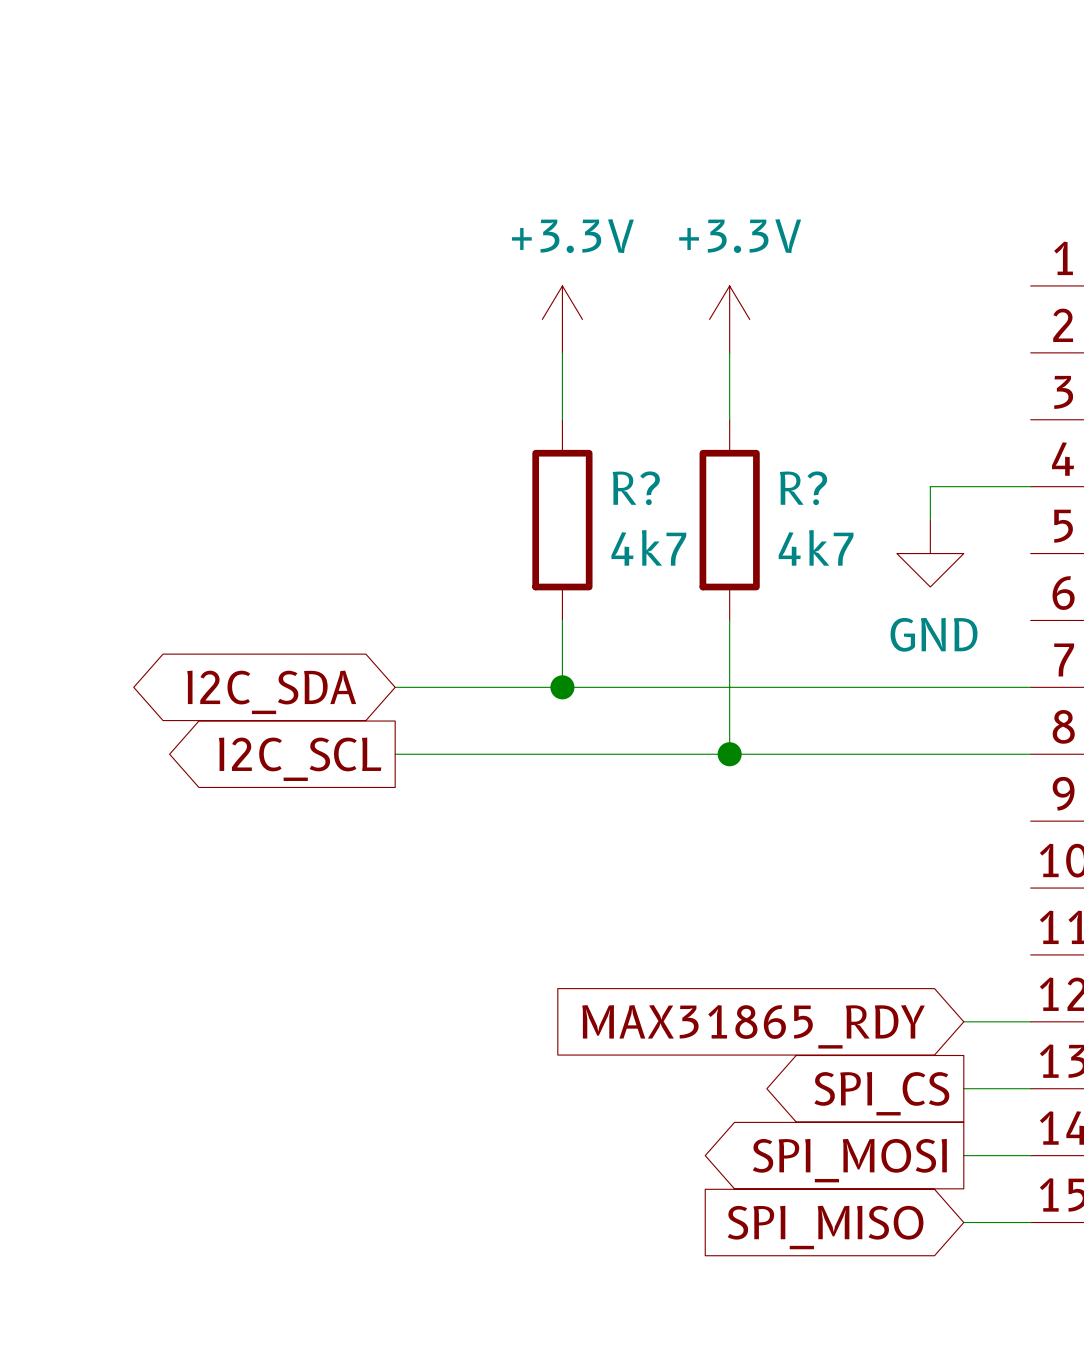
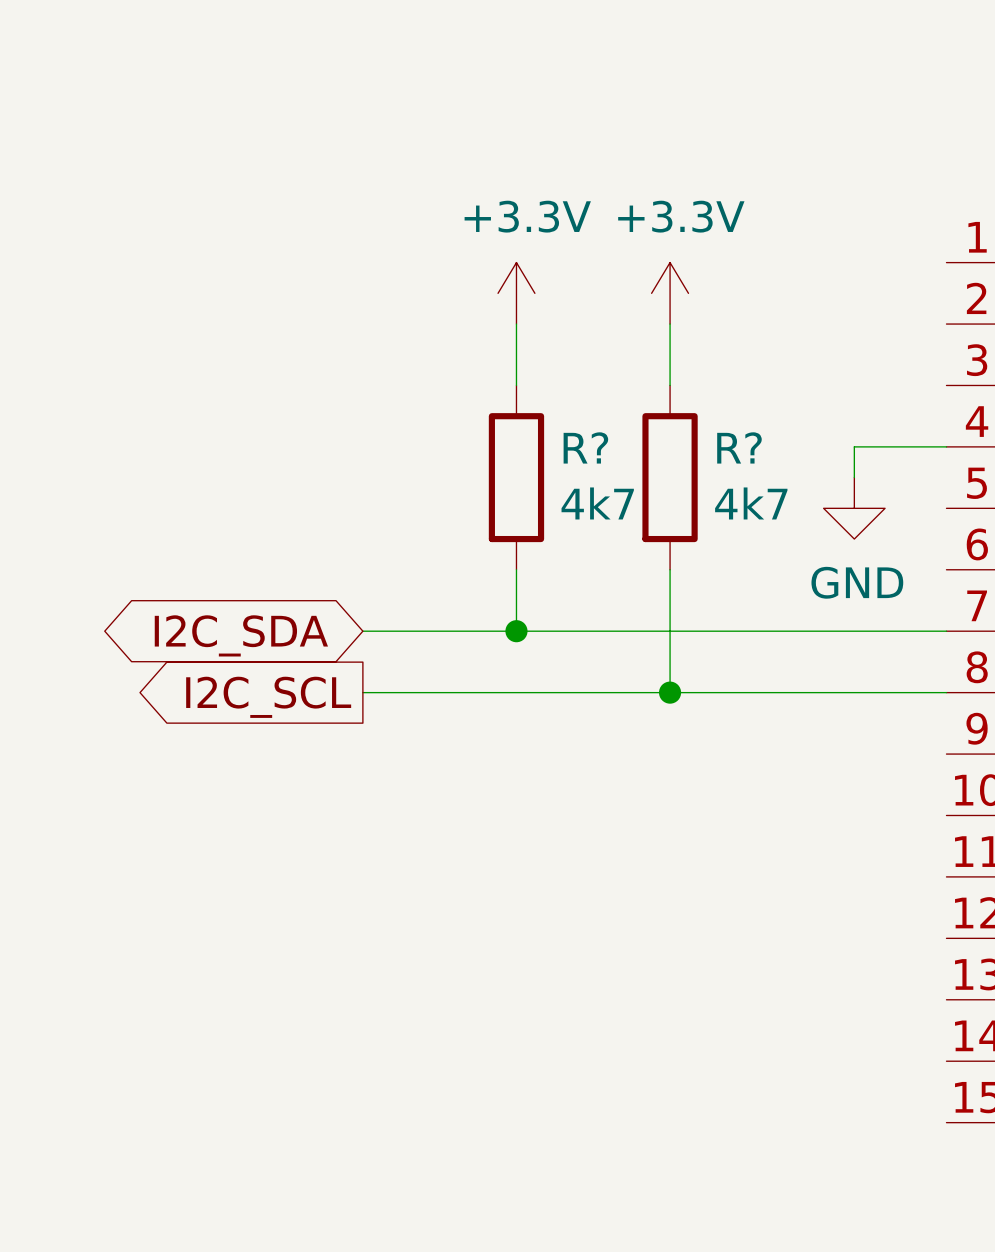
wire: (963, 1021) (1030, 1021) -> none
global label: MAX31865_RDY (753, 1026) -> none
wire: (963, 1088) (1030, 1088) -> none
global label: SPI_CS (881, 1093) -> none
wire: (963, 1155) (1030, 1155) -> none
global label: SPI_MOSI (849, 1160) -> none
wire: (963, 1222) (1030, 1222) -> none
global label: SPI_MISO (825, 1227) -> none

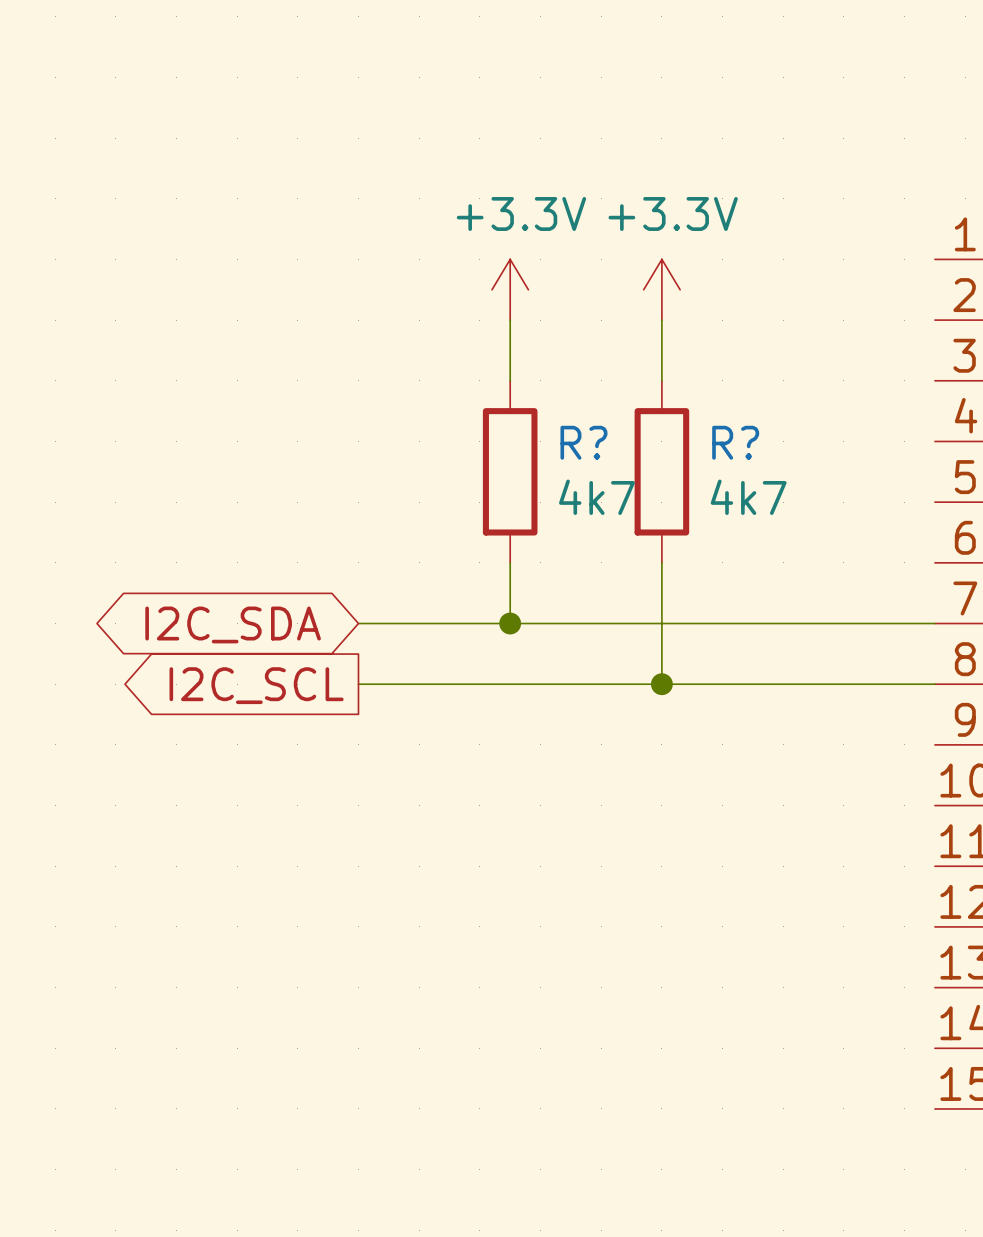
wire: (946, 446) (854, 446) (854, 477) -> none
power symbol: GND (854, 508) -> none

